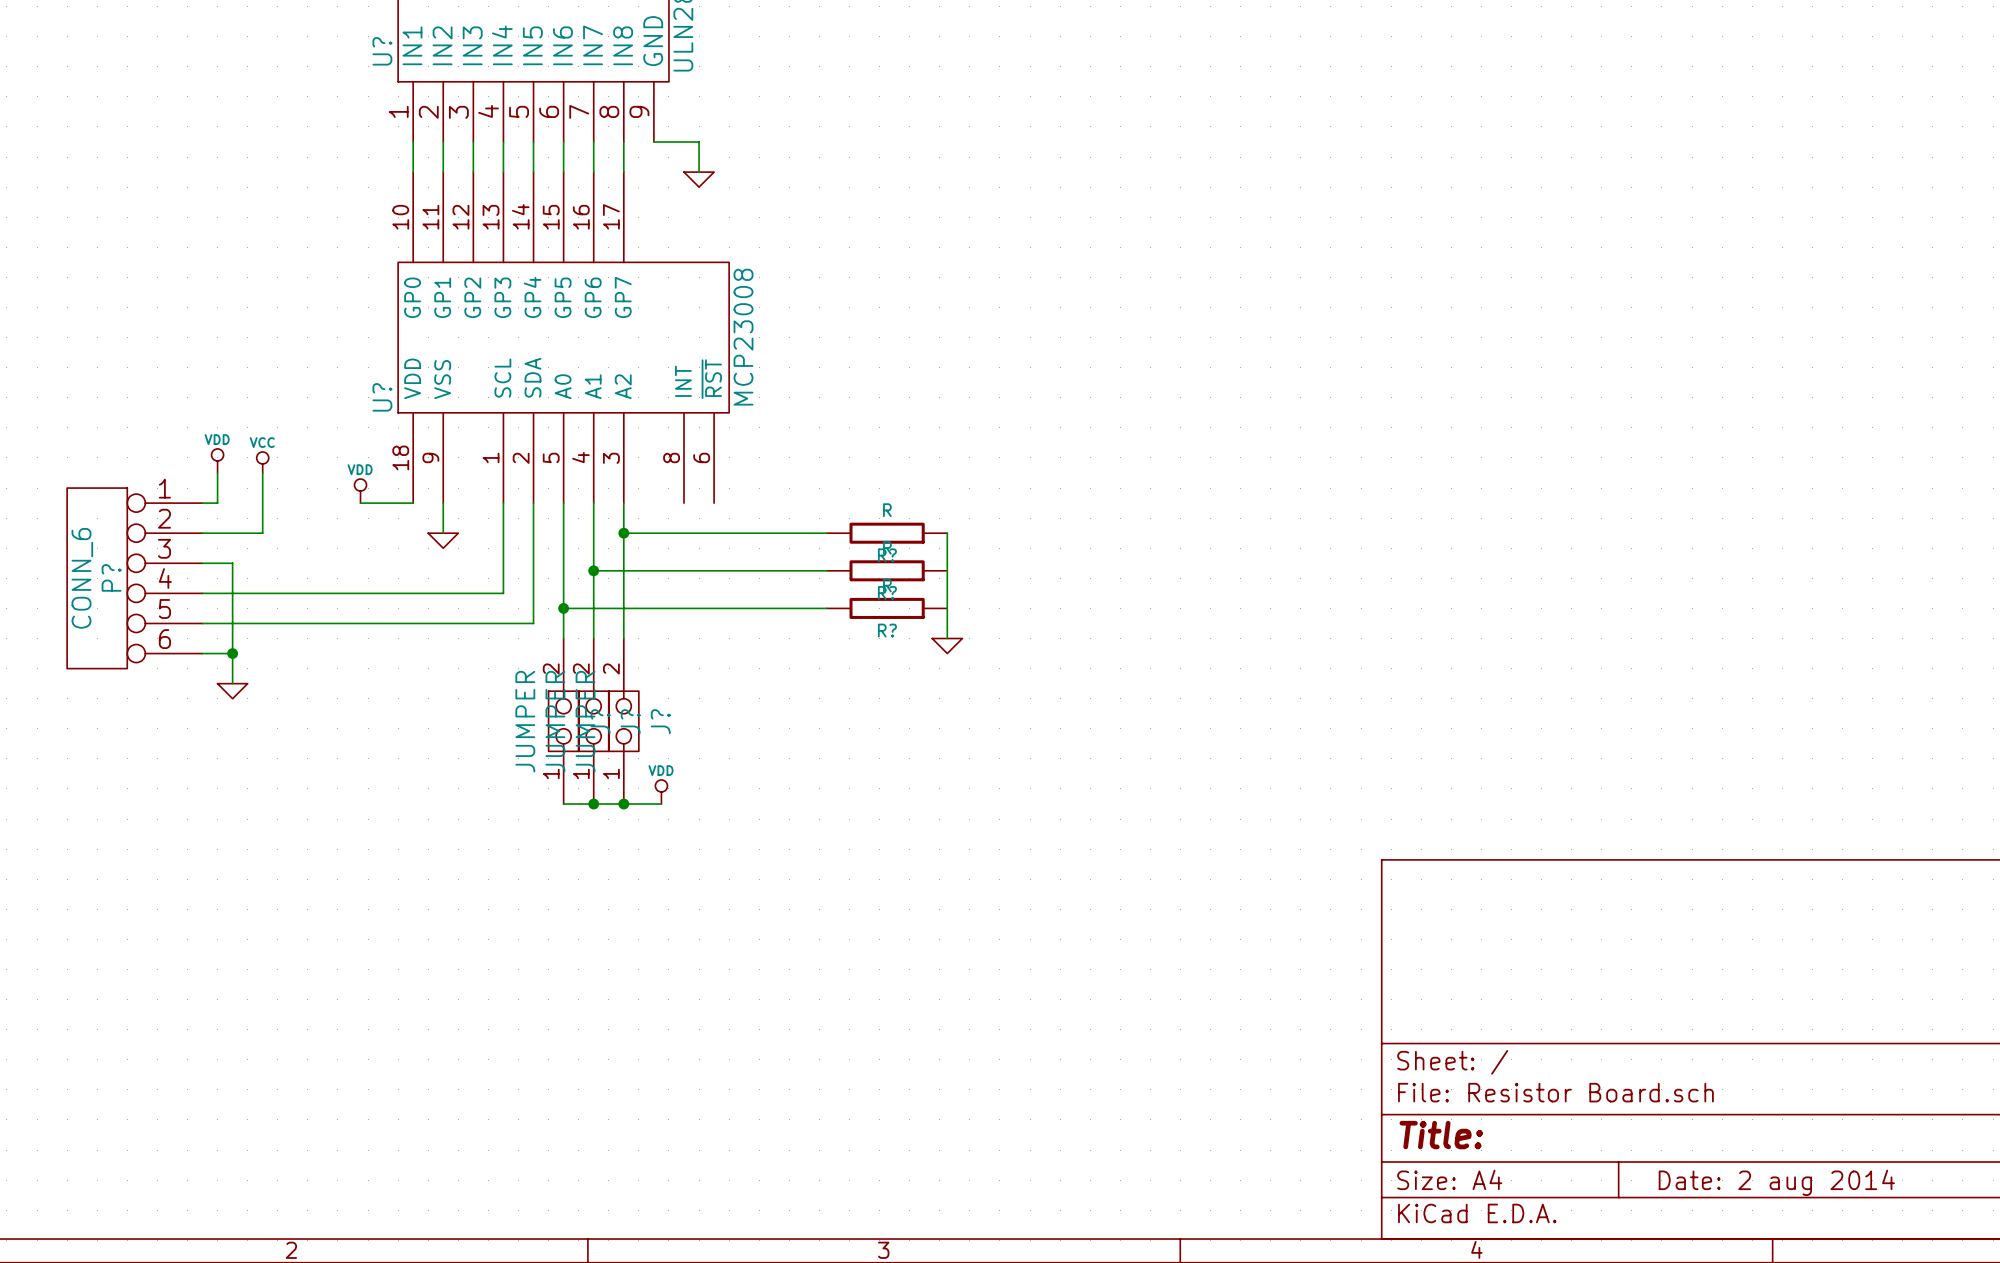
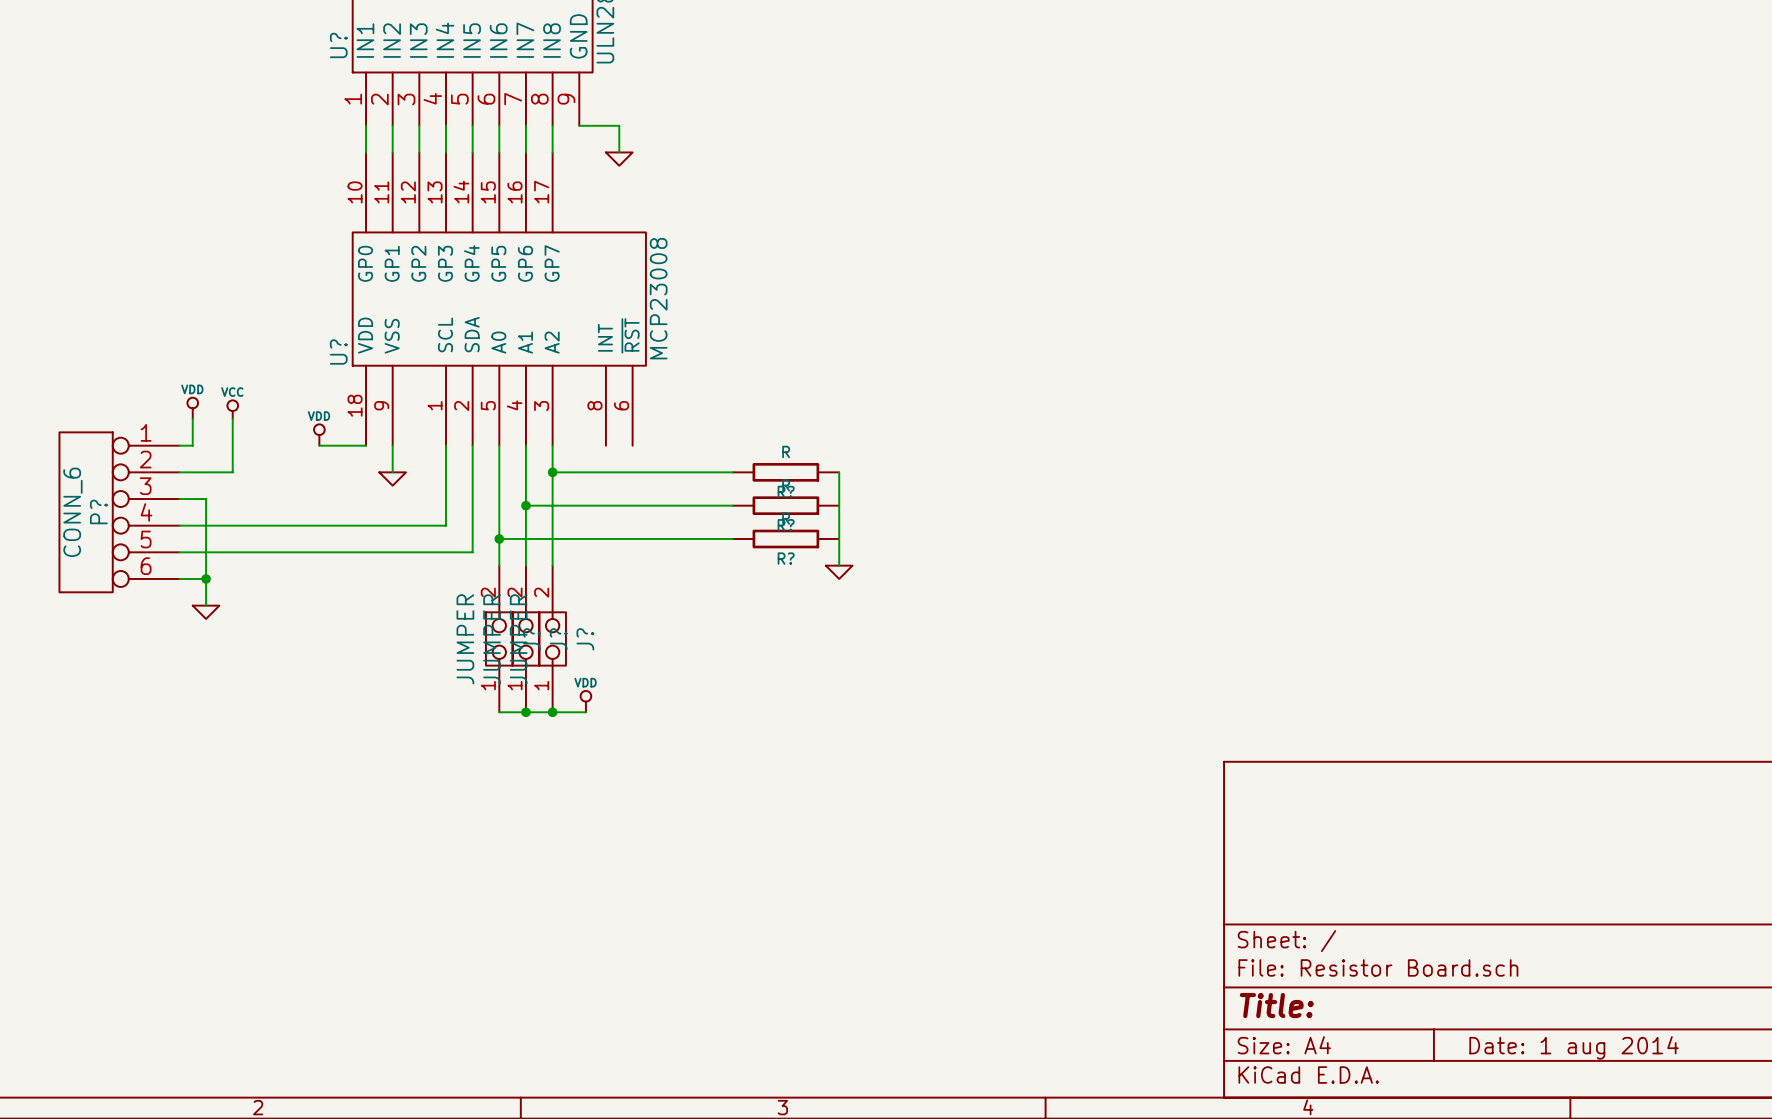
title block: Date: 2 aug 2014 (1776, 1182) -> Date: 1 aug 2014 (1574, 1047)

